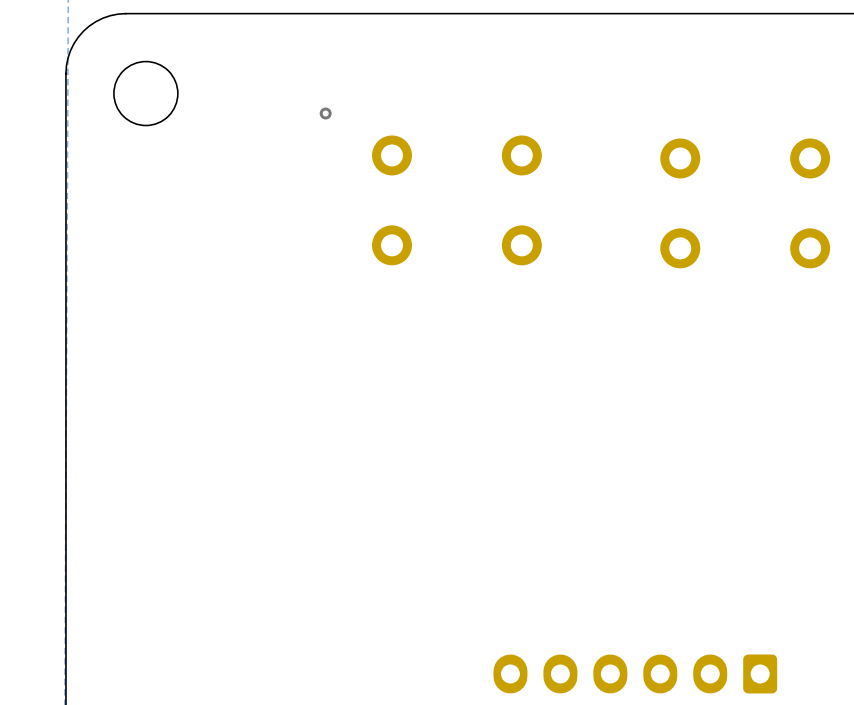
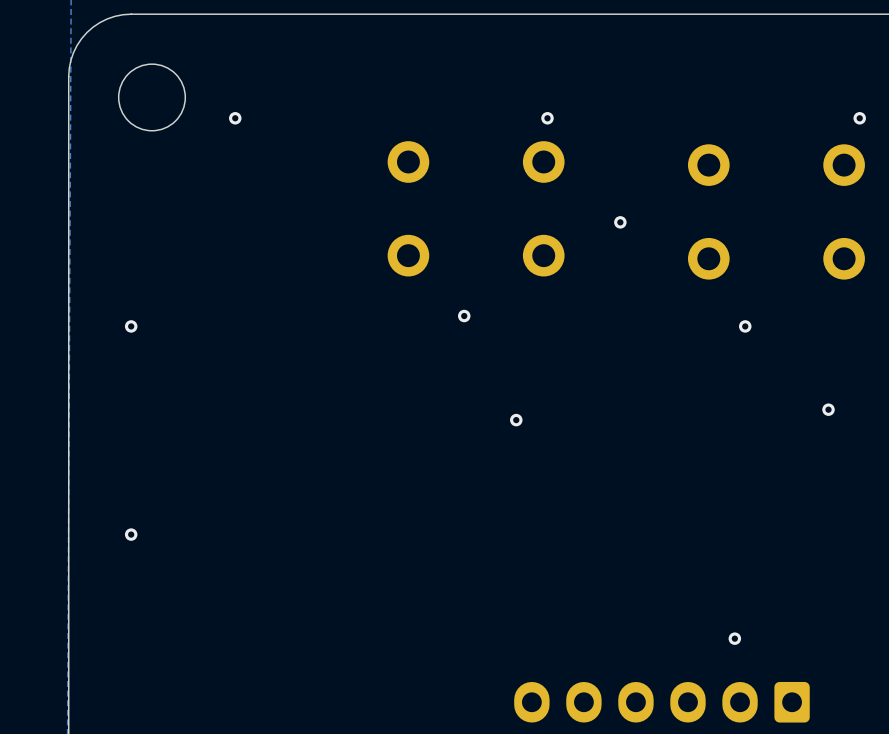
via: none -> (235, 118)
via: (325, 113) -> none
via: none -> (547, 118)
via: none -> (859, 118)
via: none -> (620, 222)
via: none -> (464, 316)
via: none -> (131, 326)
via: none -> (745, 326)
via: none -> (828, 409)
via: none -> (516, 420)
via: none -> (131, 534)
via: none -> (734, 638)

